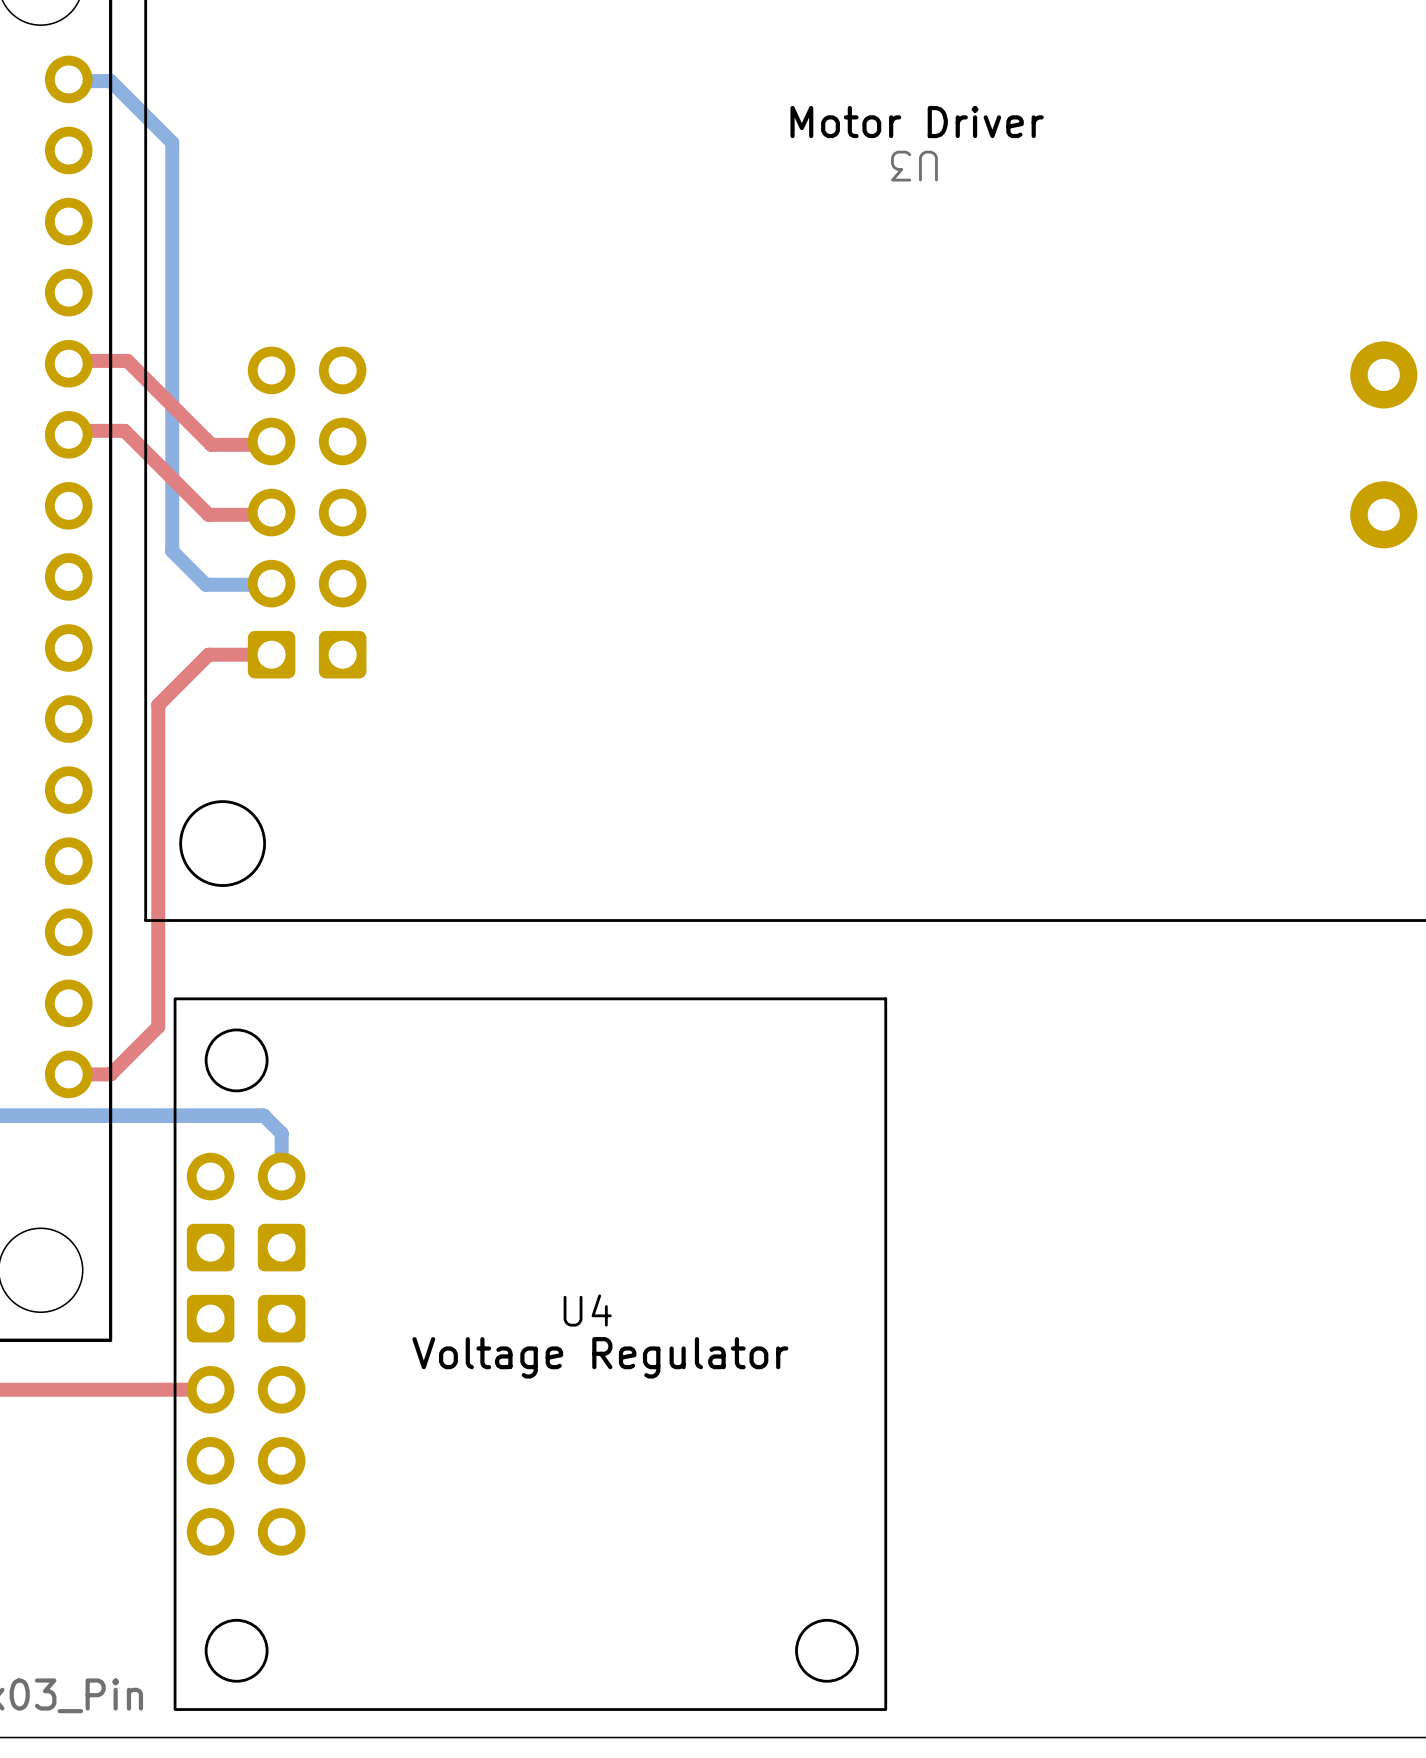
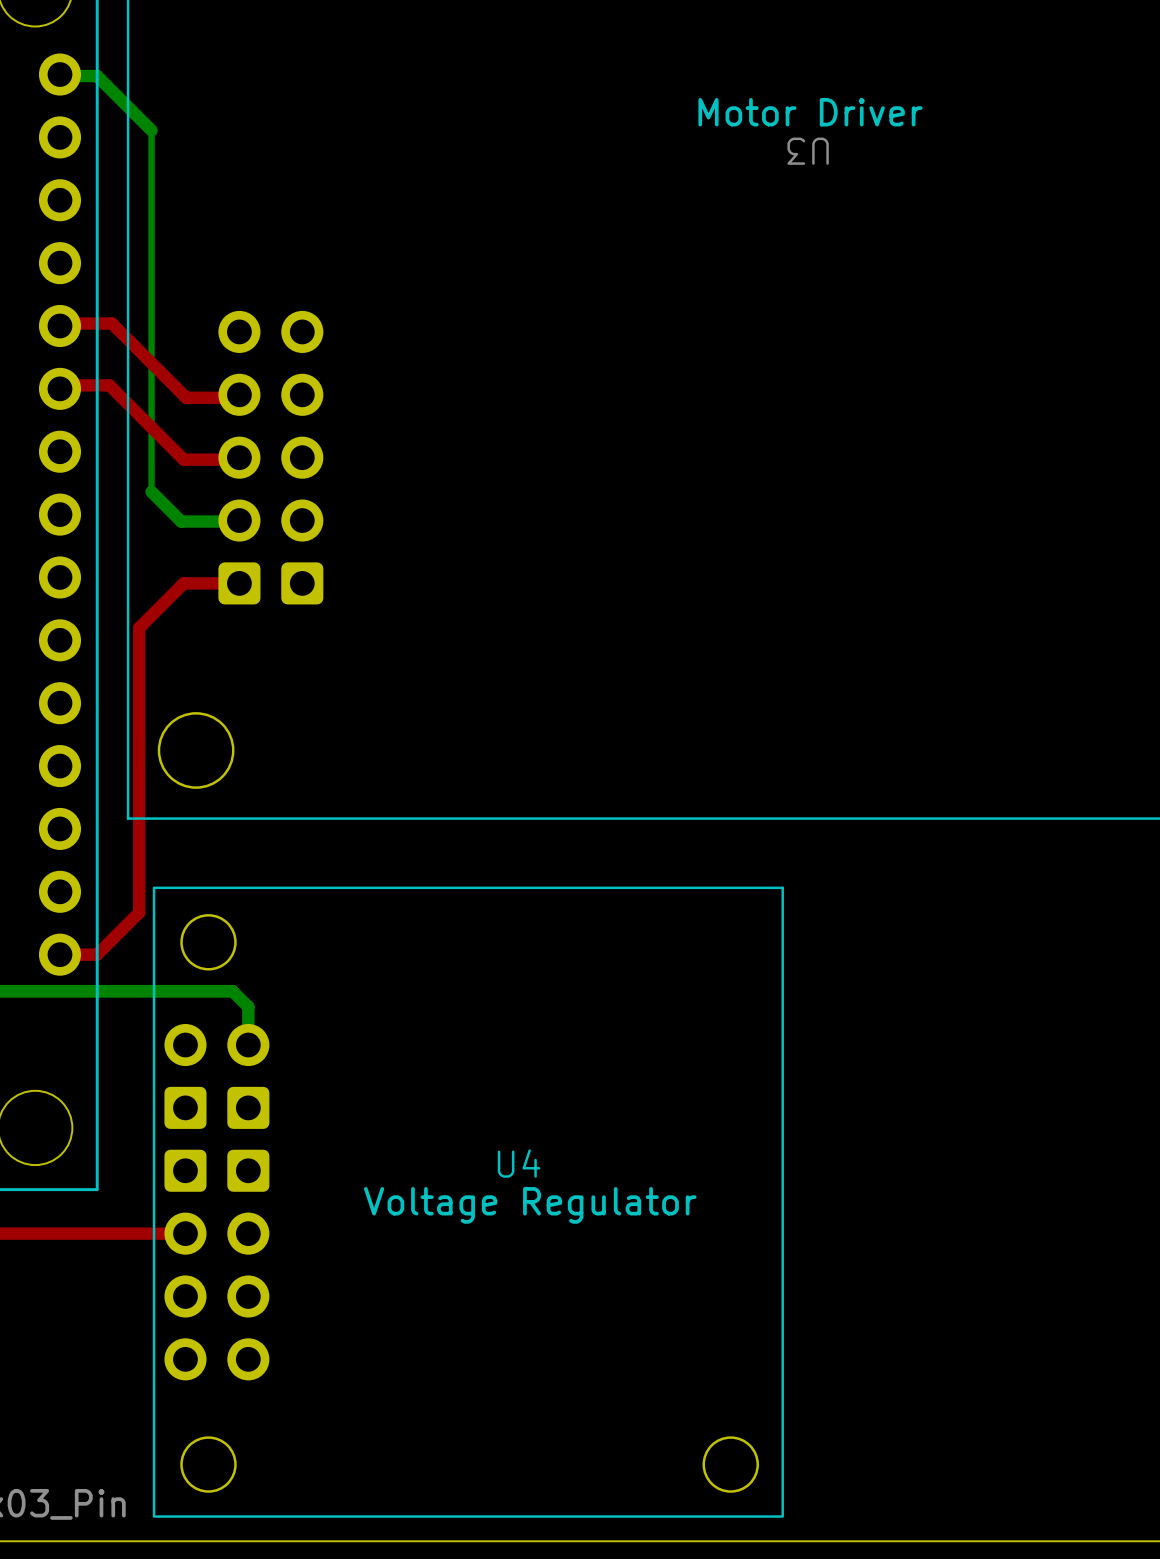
bottom track width: thick (172, 142) (172, 551) -> thin (151, 130) (151, 491)

